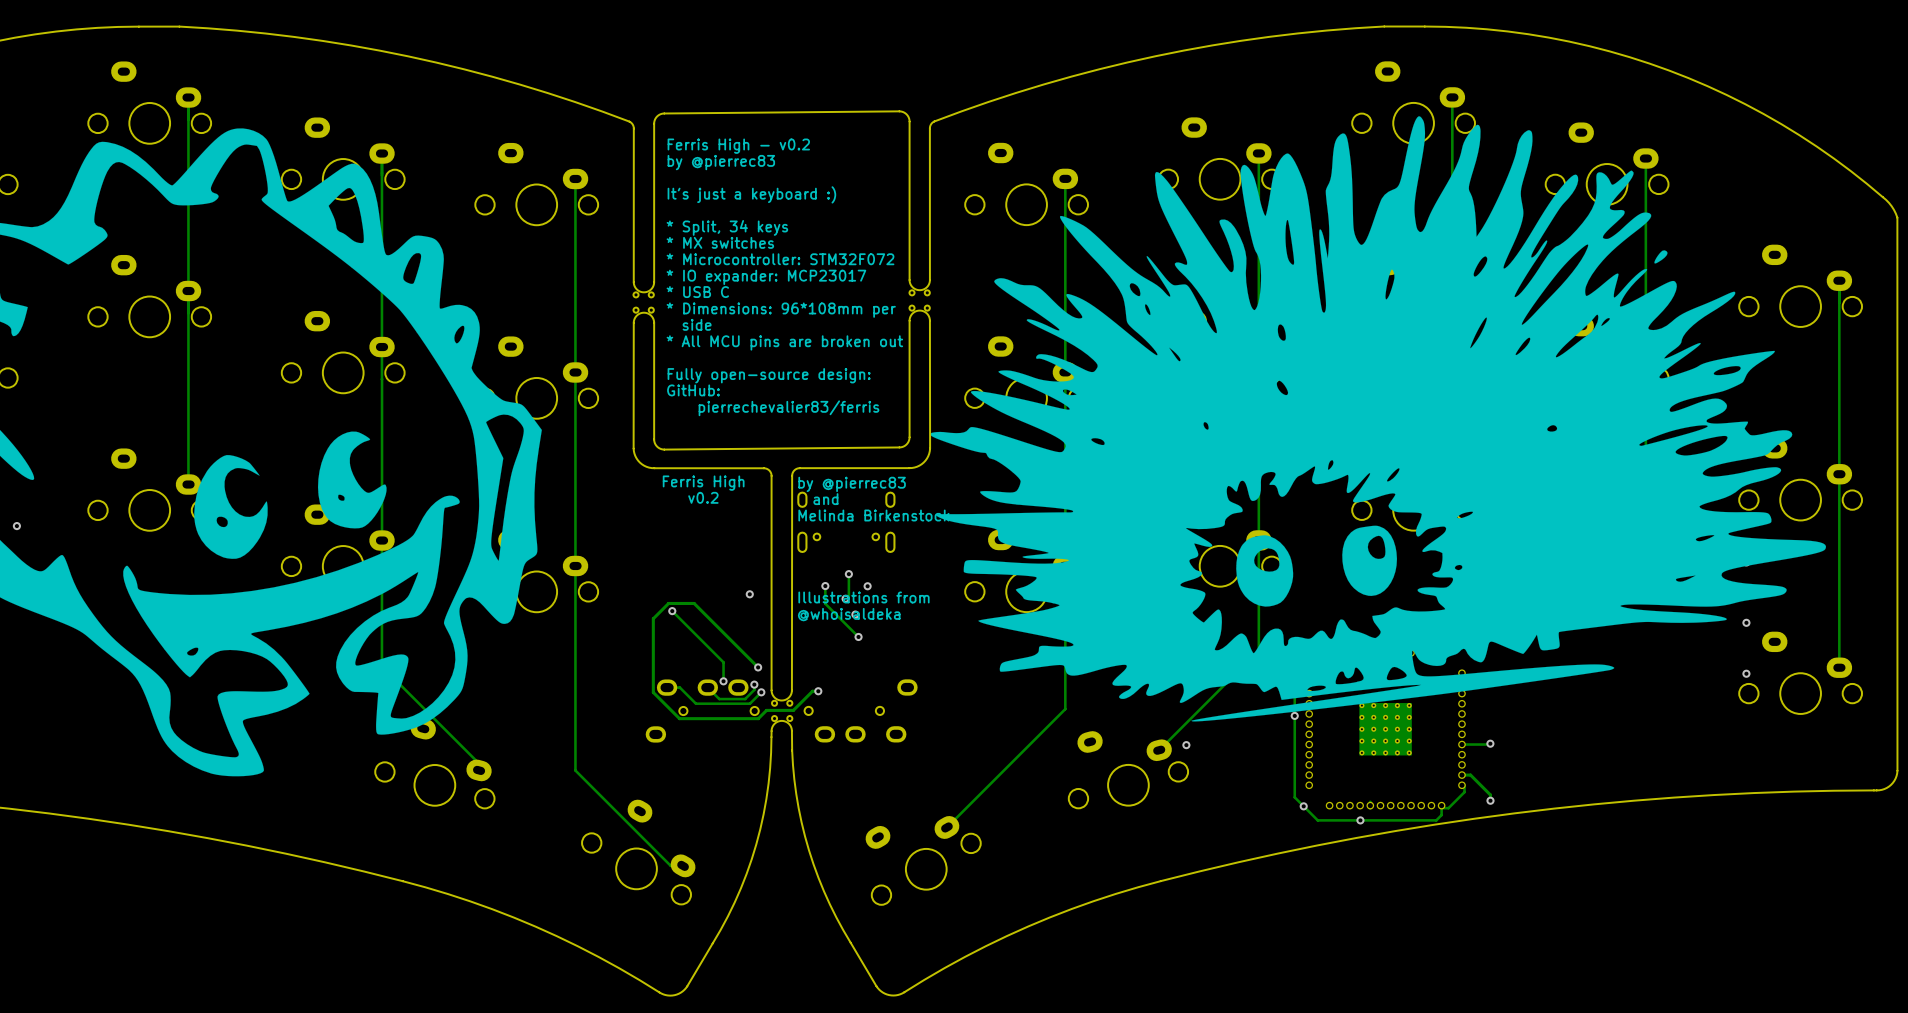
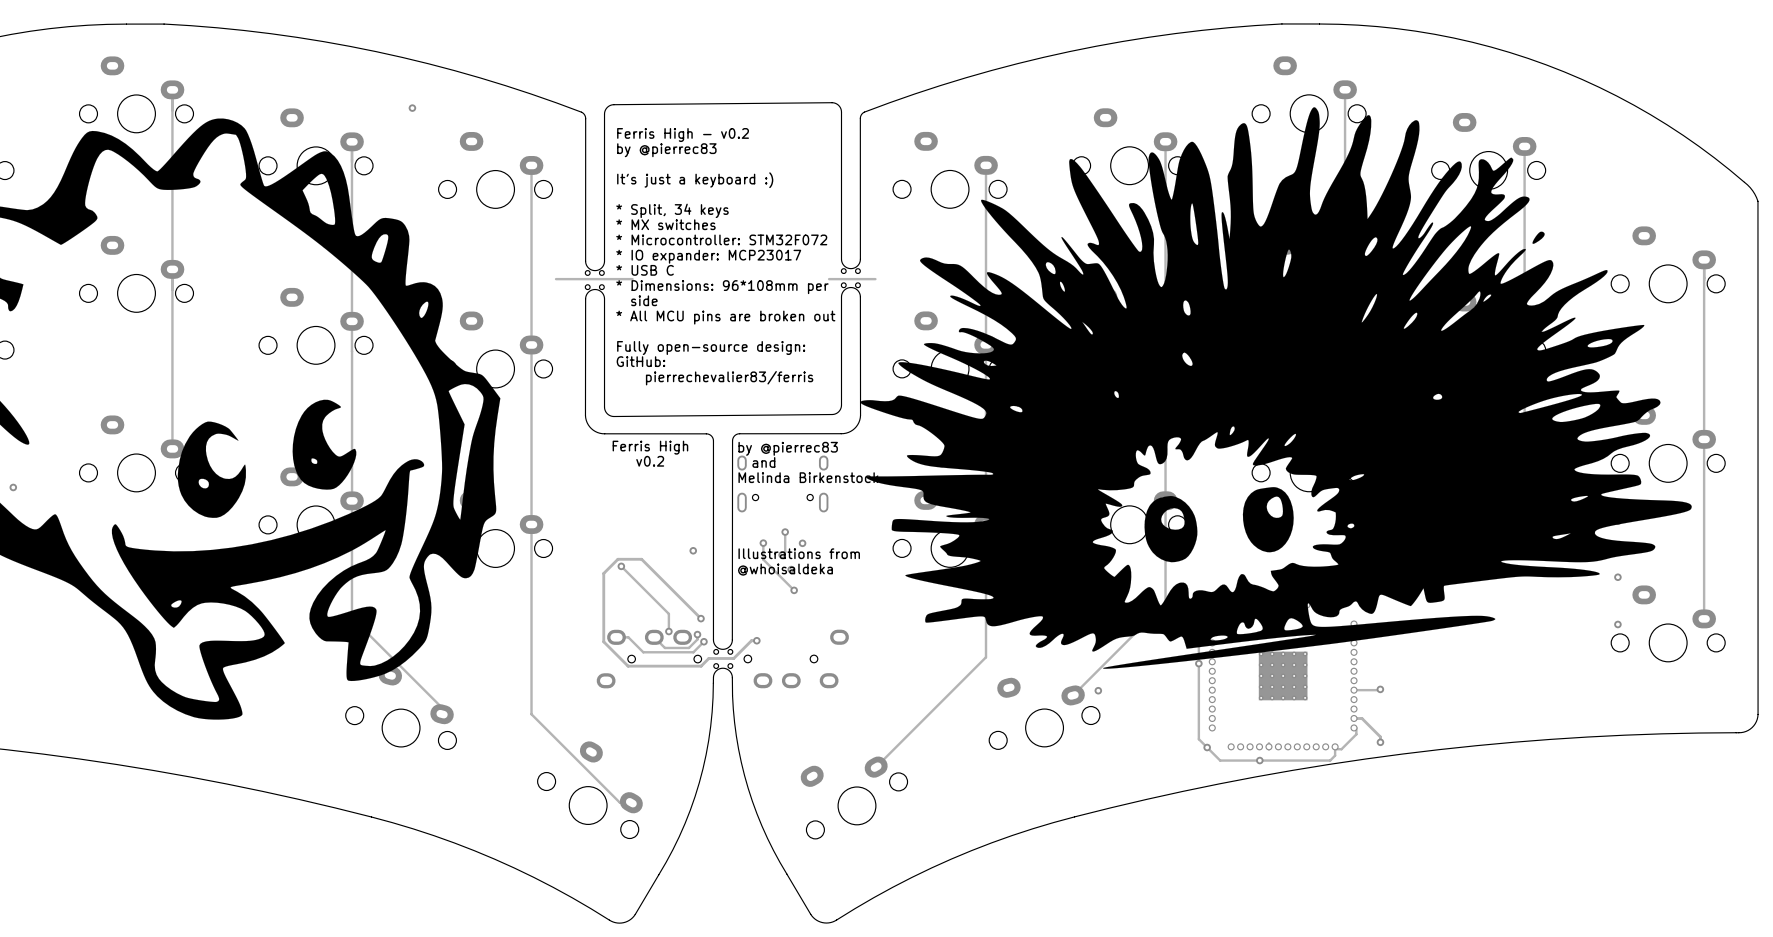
via: none -> (412, 108)
track: none -> (632, 279) (556, 279)
track: none -> (875, 279) (829, 279)

